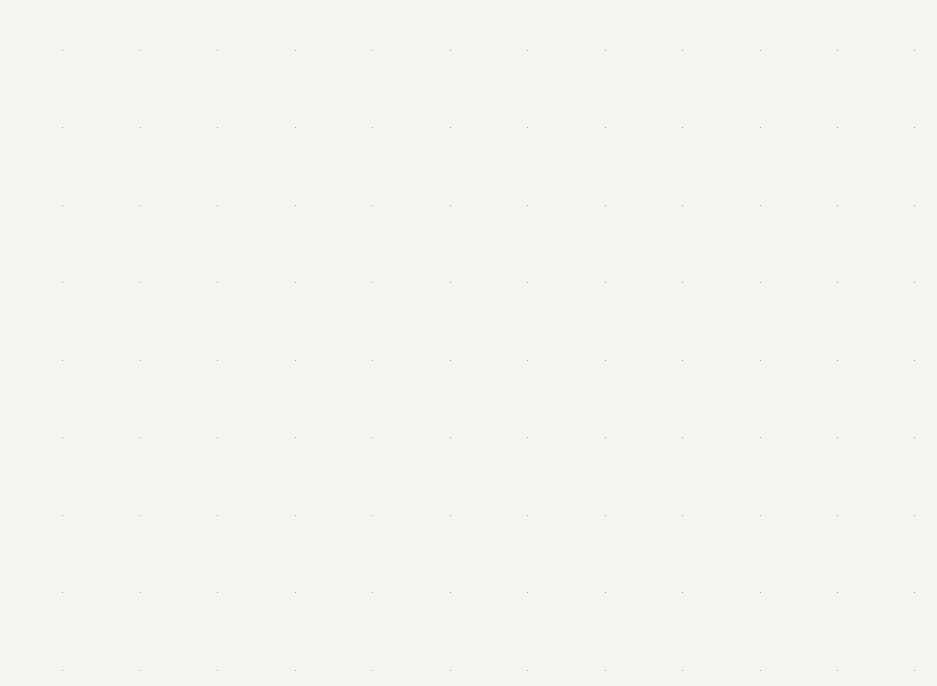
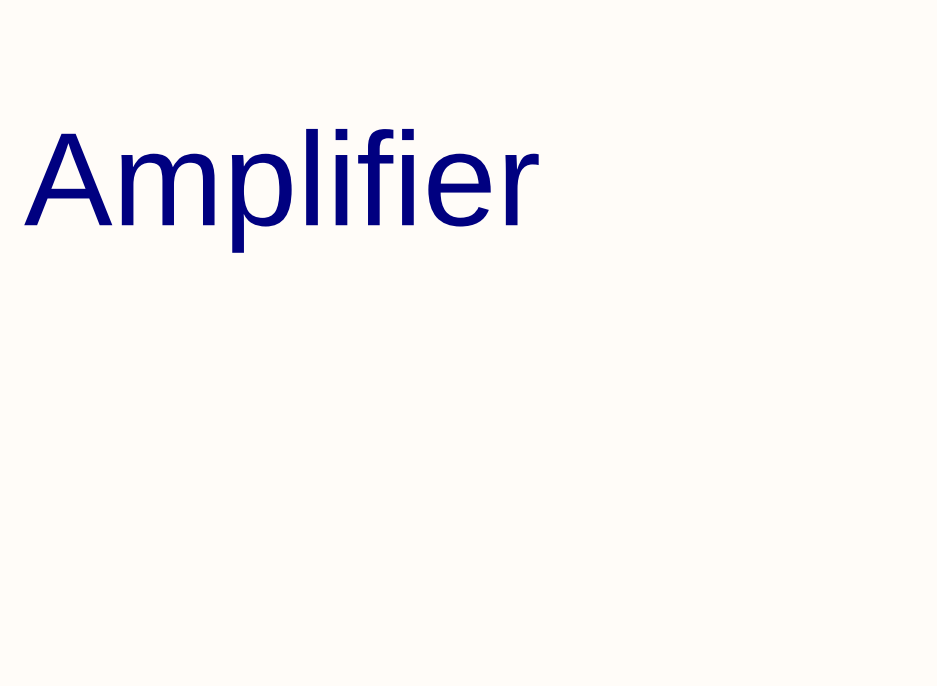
text: none -> Amplifier (281, 190)

